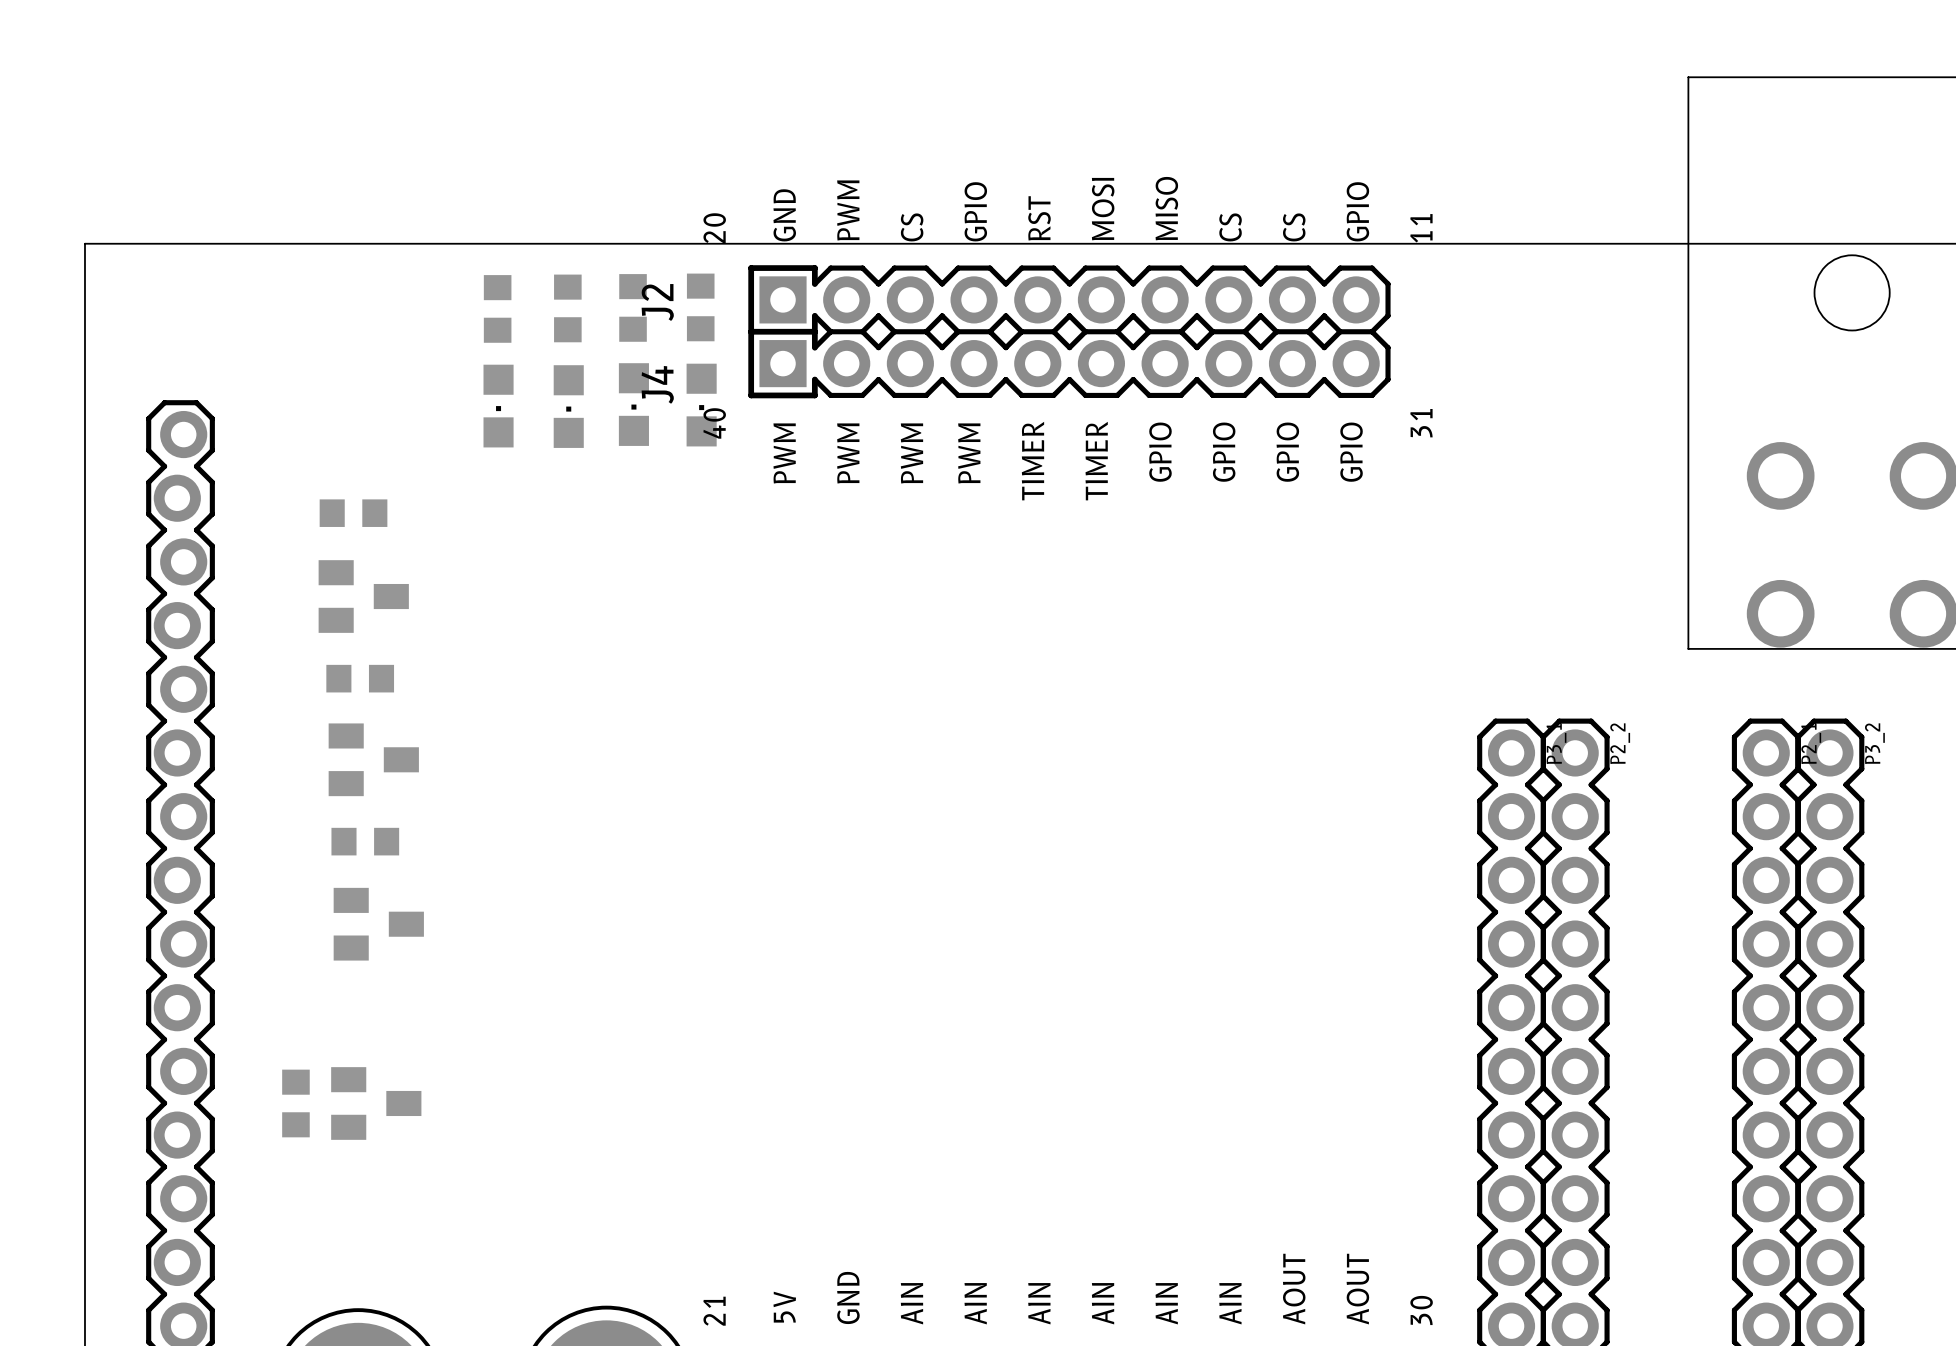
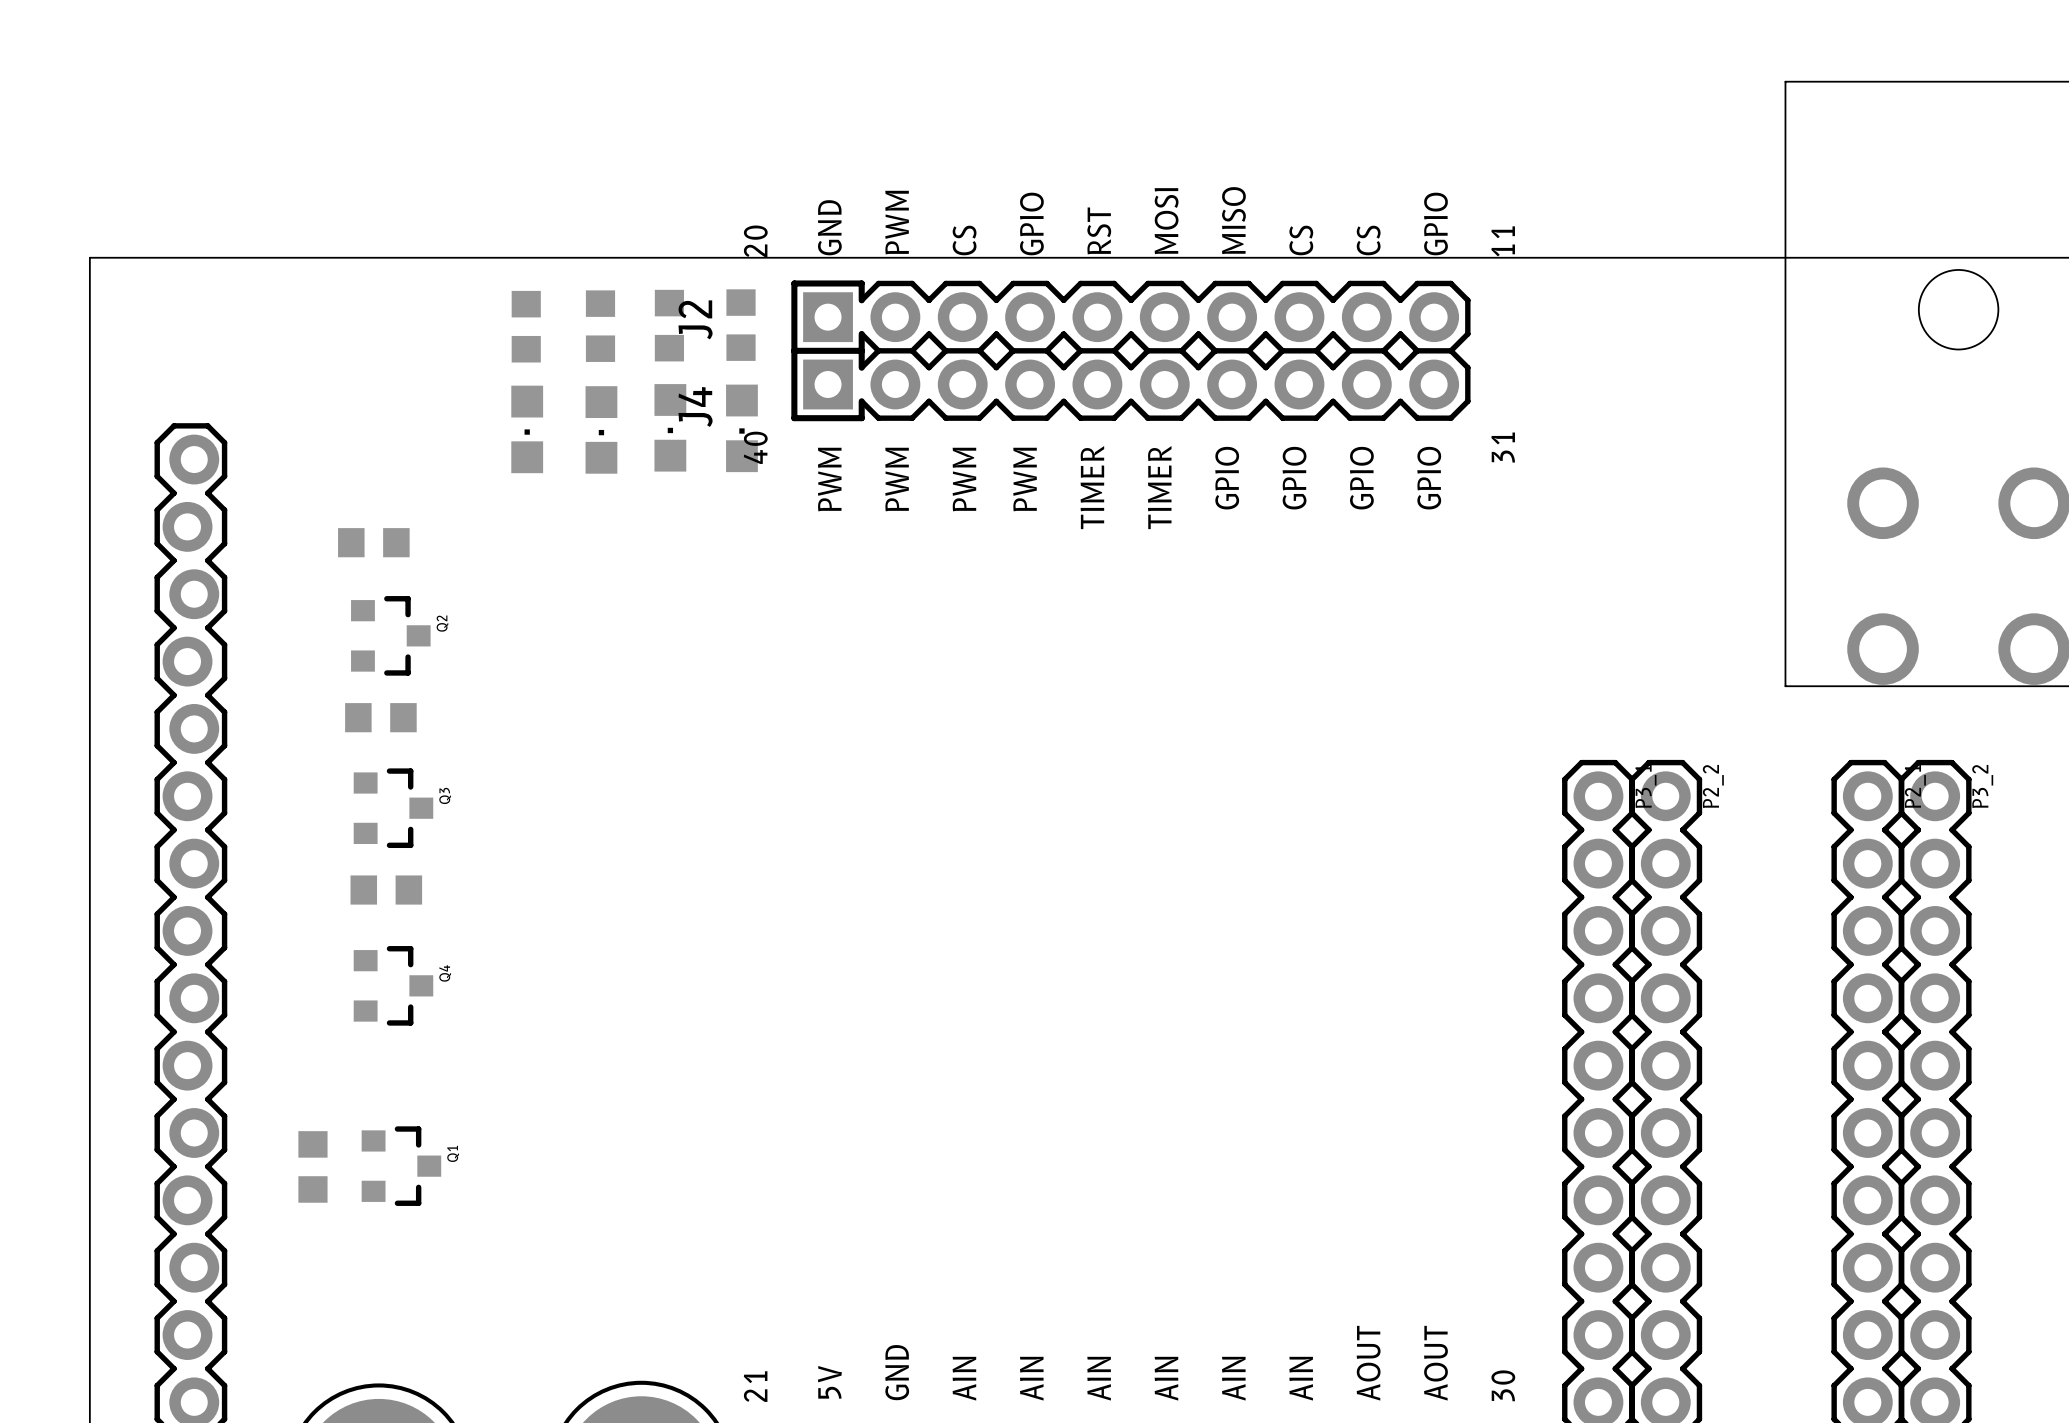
part: (363, 596) -> none
Q2: none -> (390, 635)
part: (373, 759) -> none
Q3: none -> (393, 808)
part: (378, 924) -> none
Q4: none -> (393, 985)
Q1: none -> (401, 1166)
part: (376, 1103) -> none

